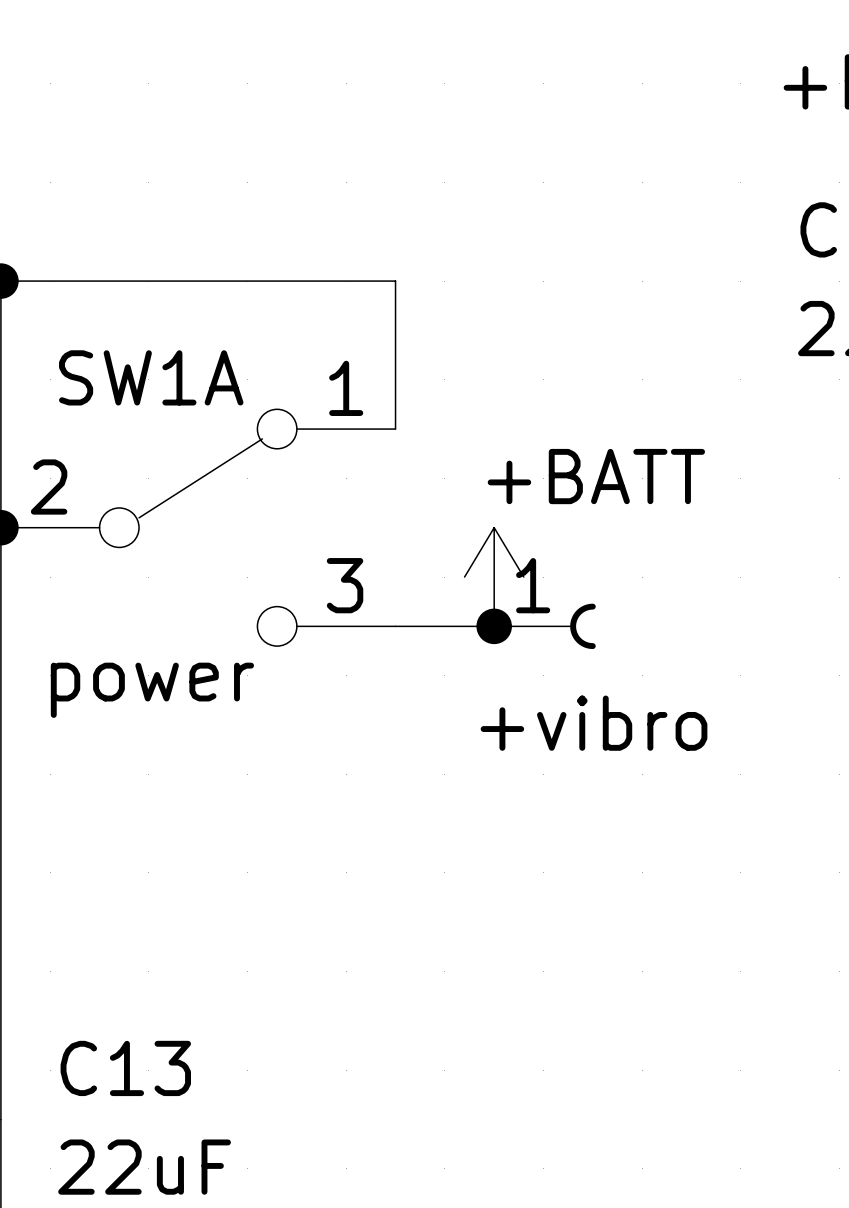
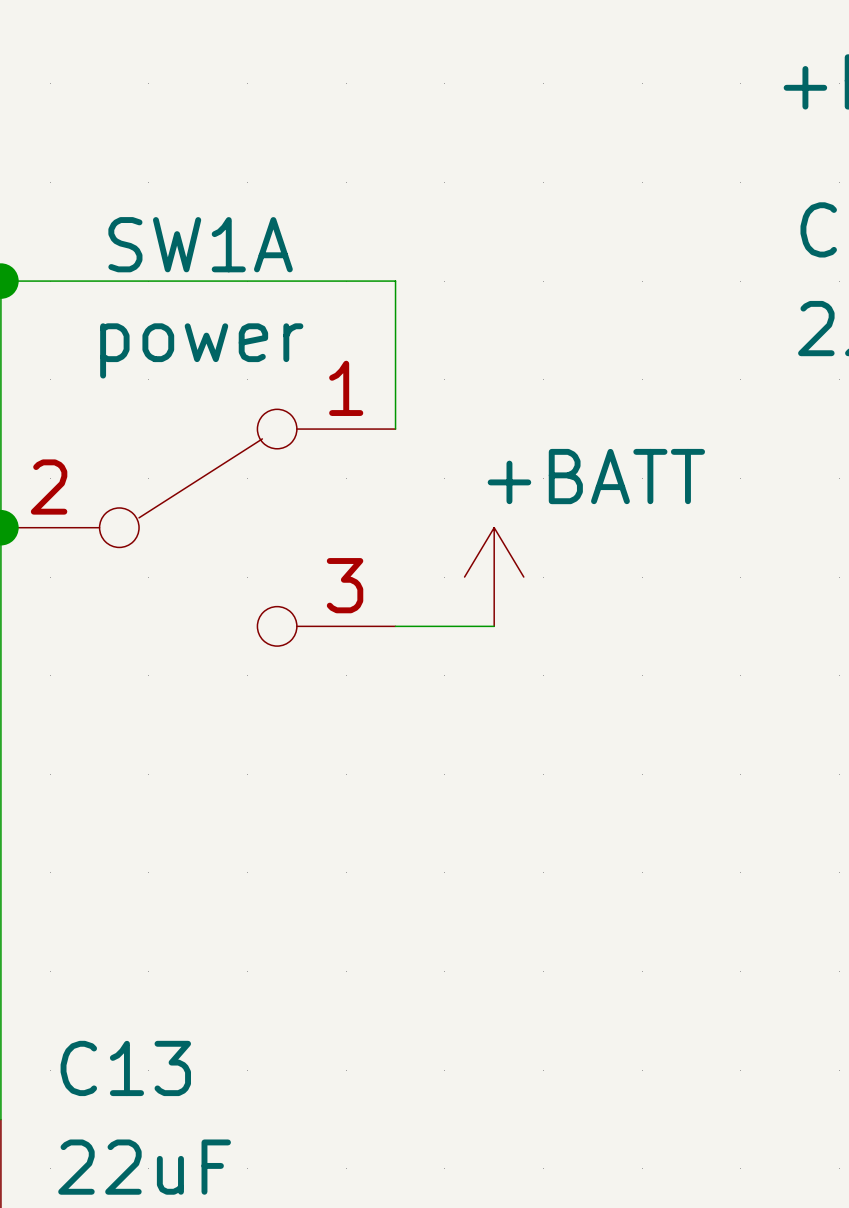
SW1A name position: SW1A (151, 377) -> SW1A (200, 244)
junction: (494, 626) -> none
part: +vibro (544, 626) -> none
SW1A value position: power (152, 690) -> power (201, 350)

